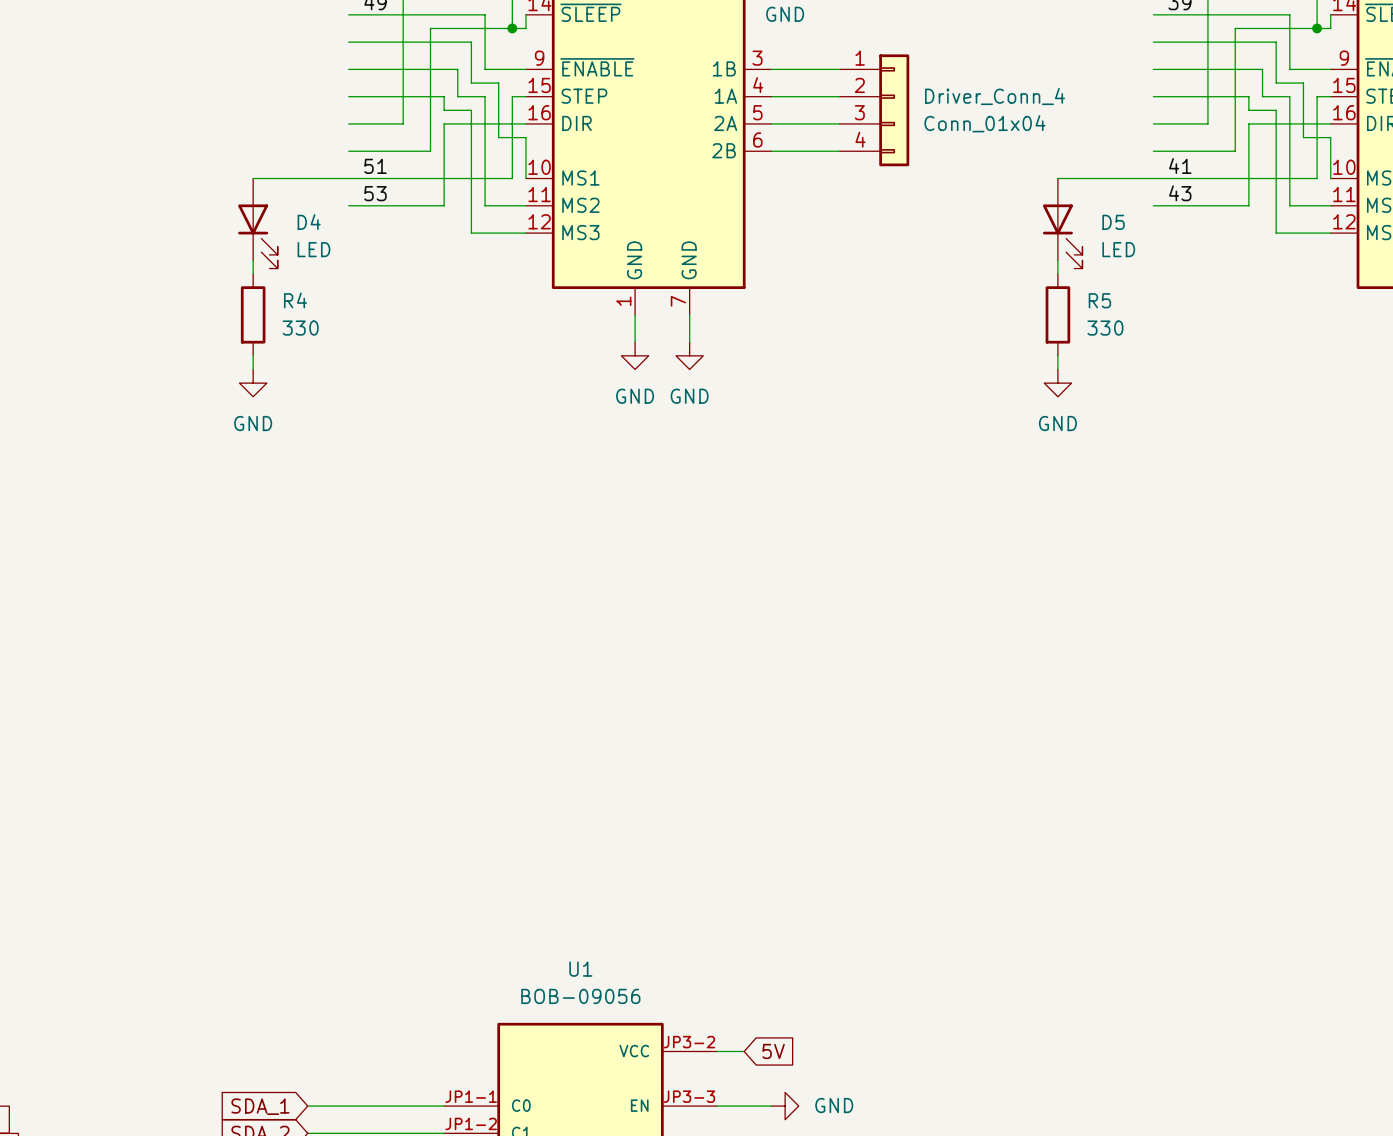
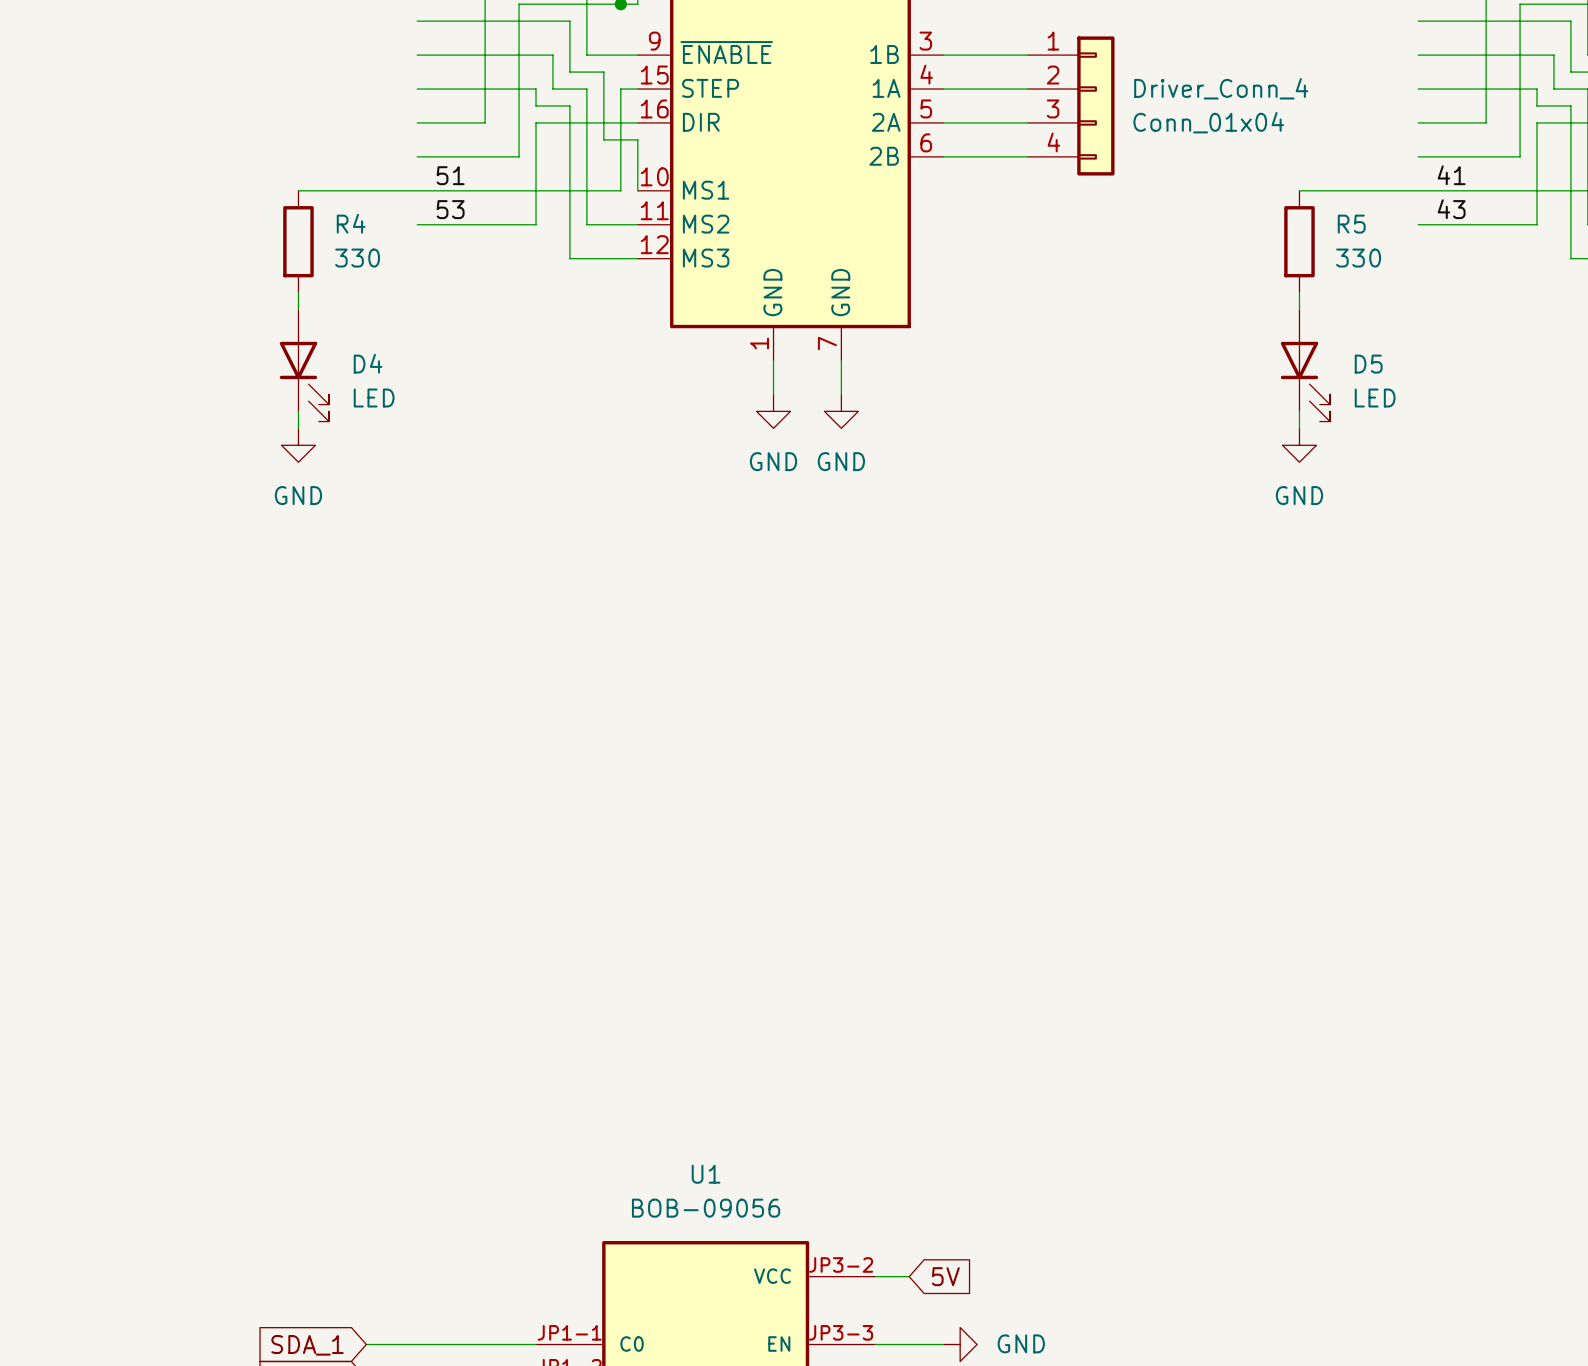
D4 position: (257, 223) -> (304, 365)
D5 position: (1062, 223) -> (1305, 365)
R4 position: (253, 314) -> (298, 241)
R5 position: (1057, 314) -> (1299, 241)

